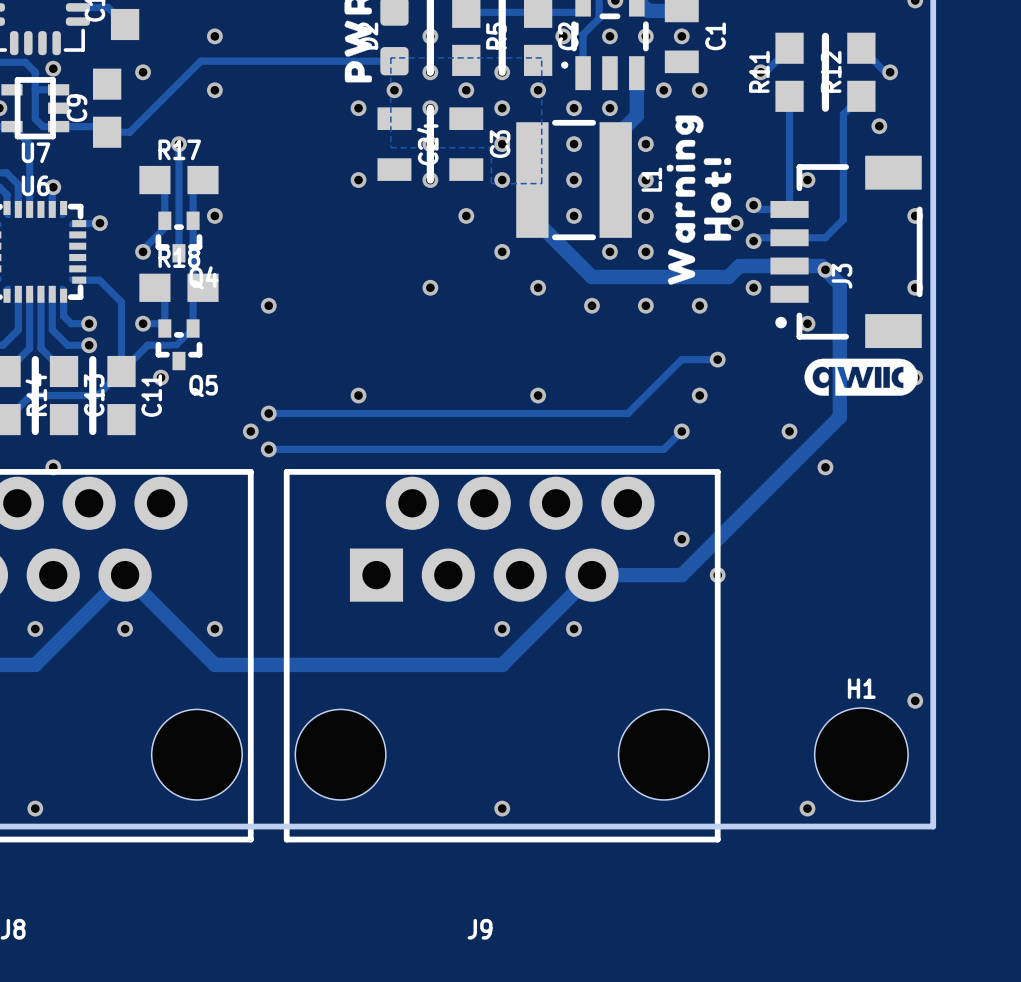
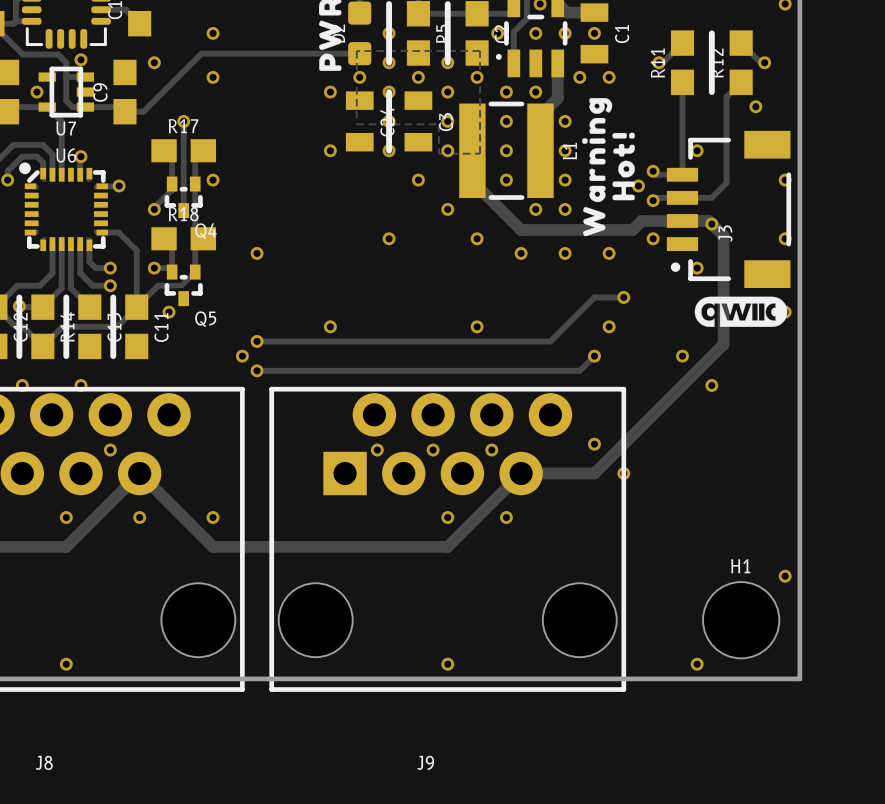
via: none -> (110, 450)
via: none -> (377, 450)
via: none -> (433, 450)
via: none -> (491, 450)

